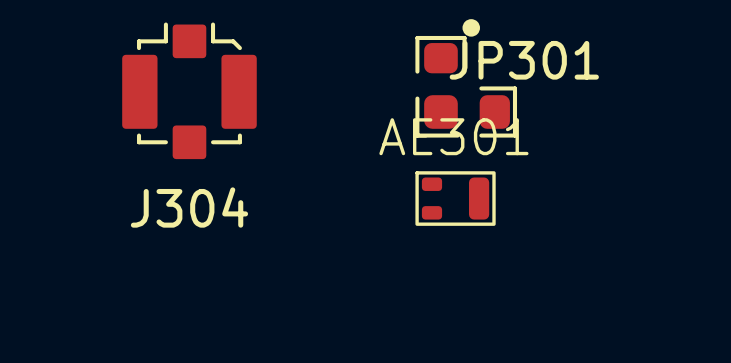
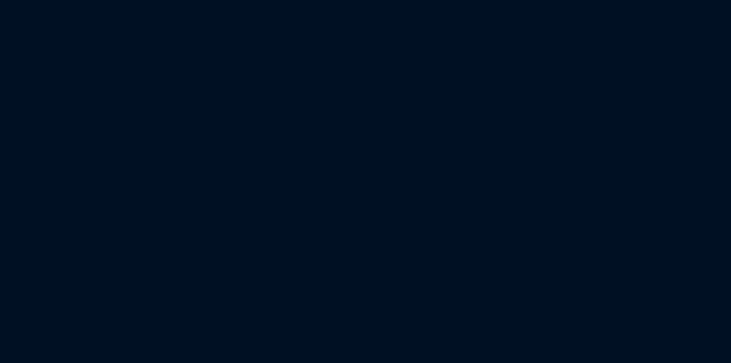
JP301: (466, 78) -> none
J304: (189, 90) -> none
AE301: (455, 198) -> none

